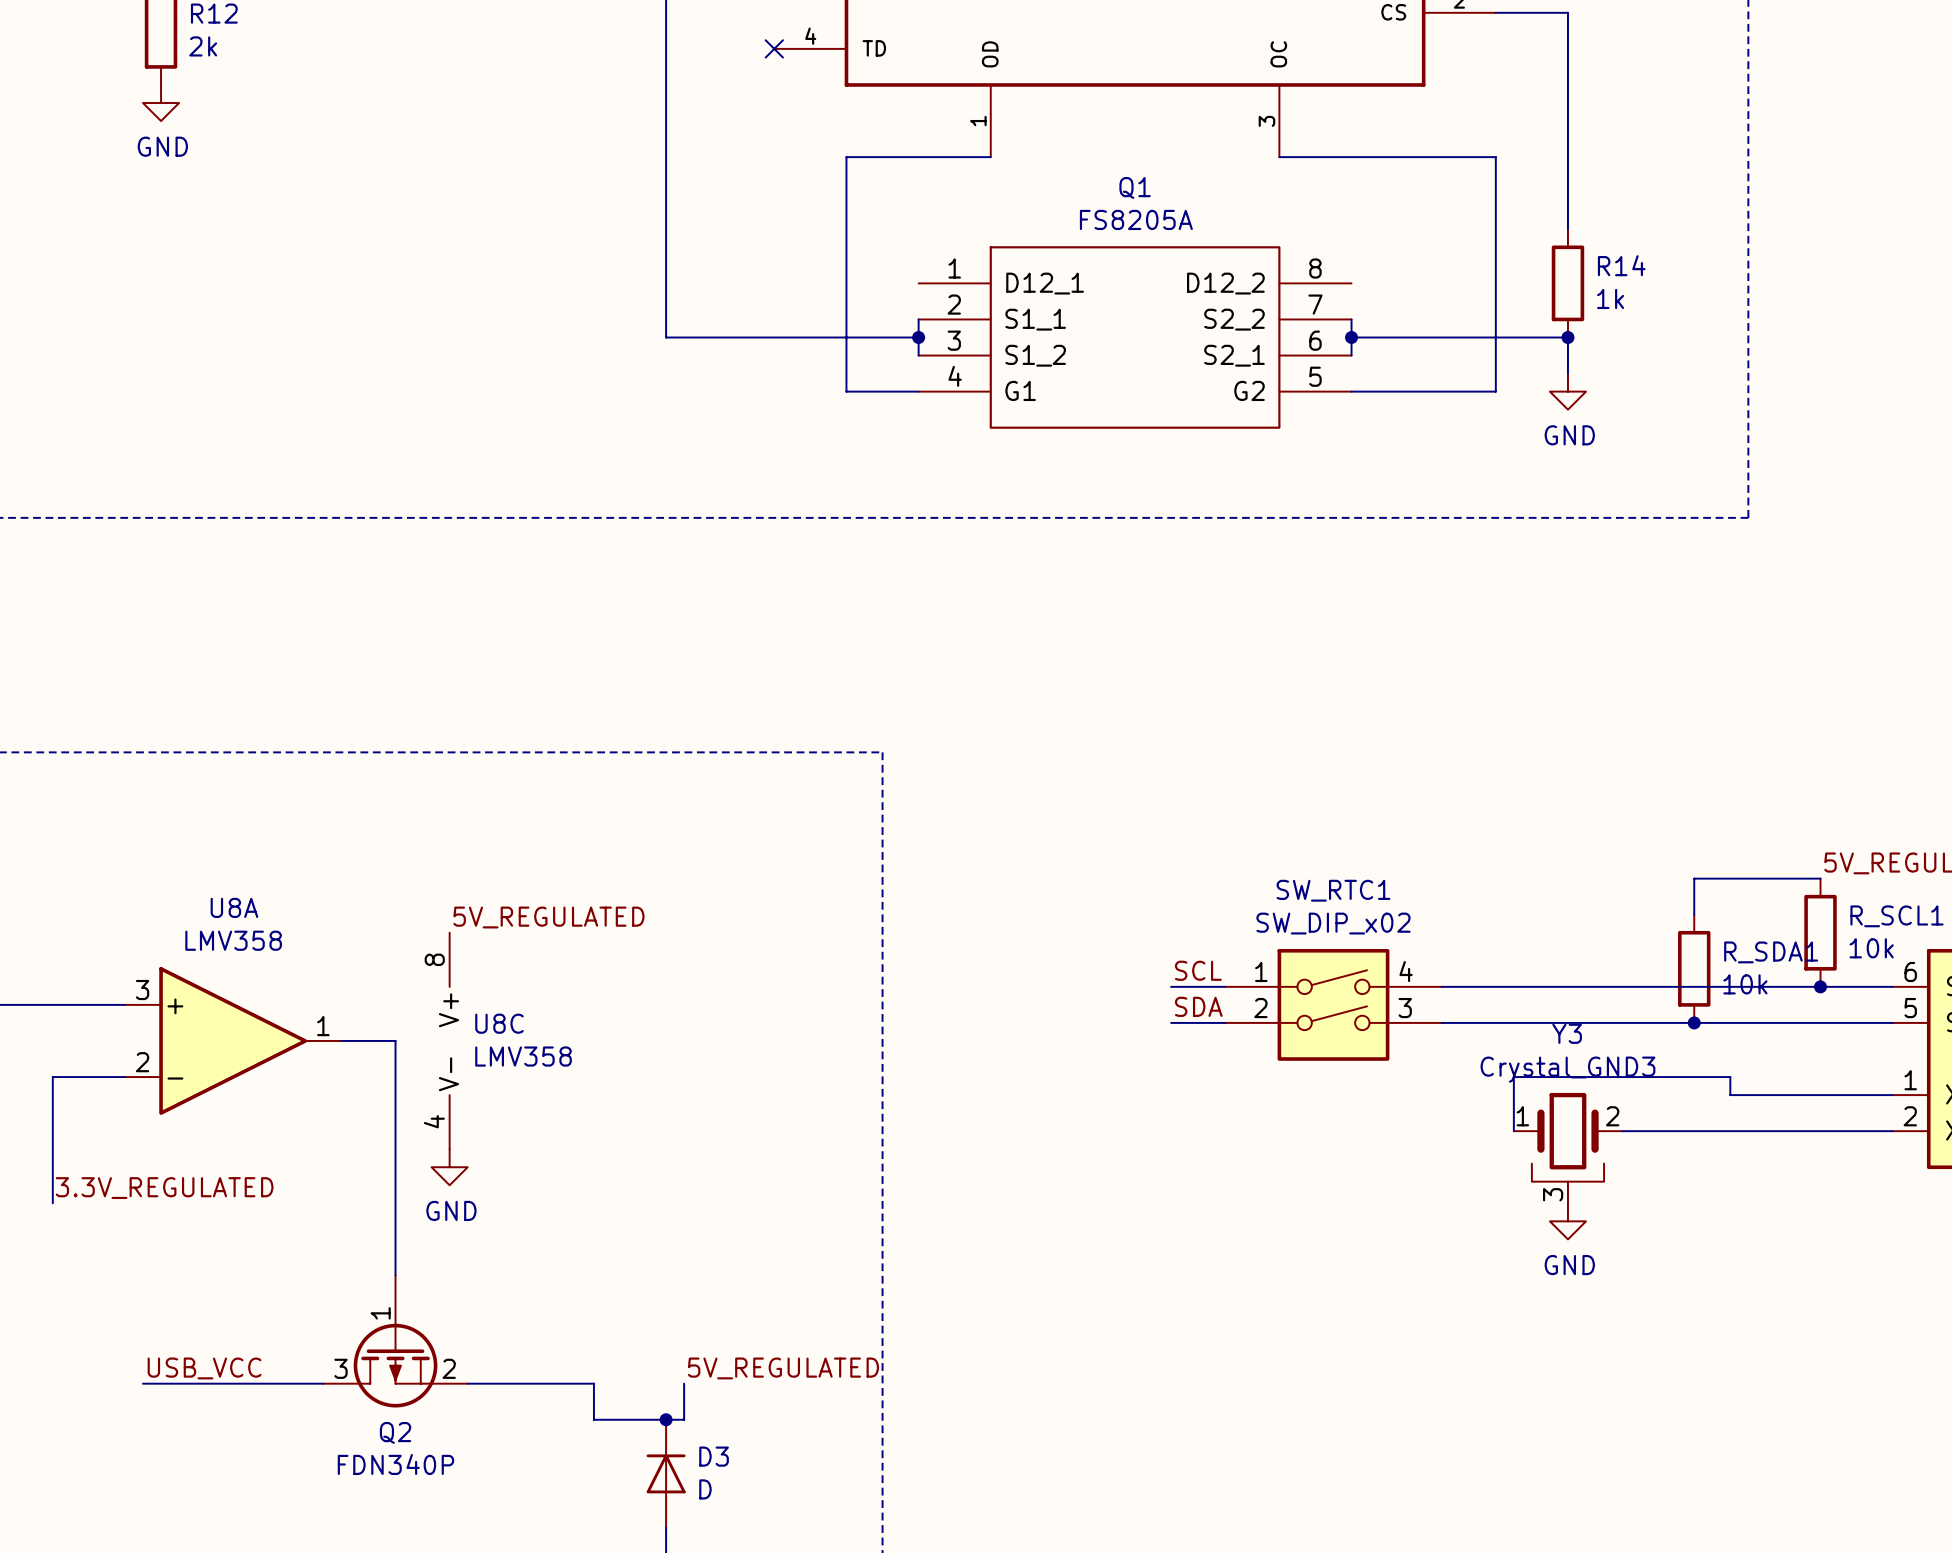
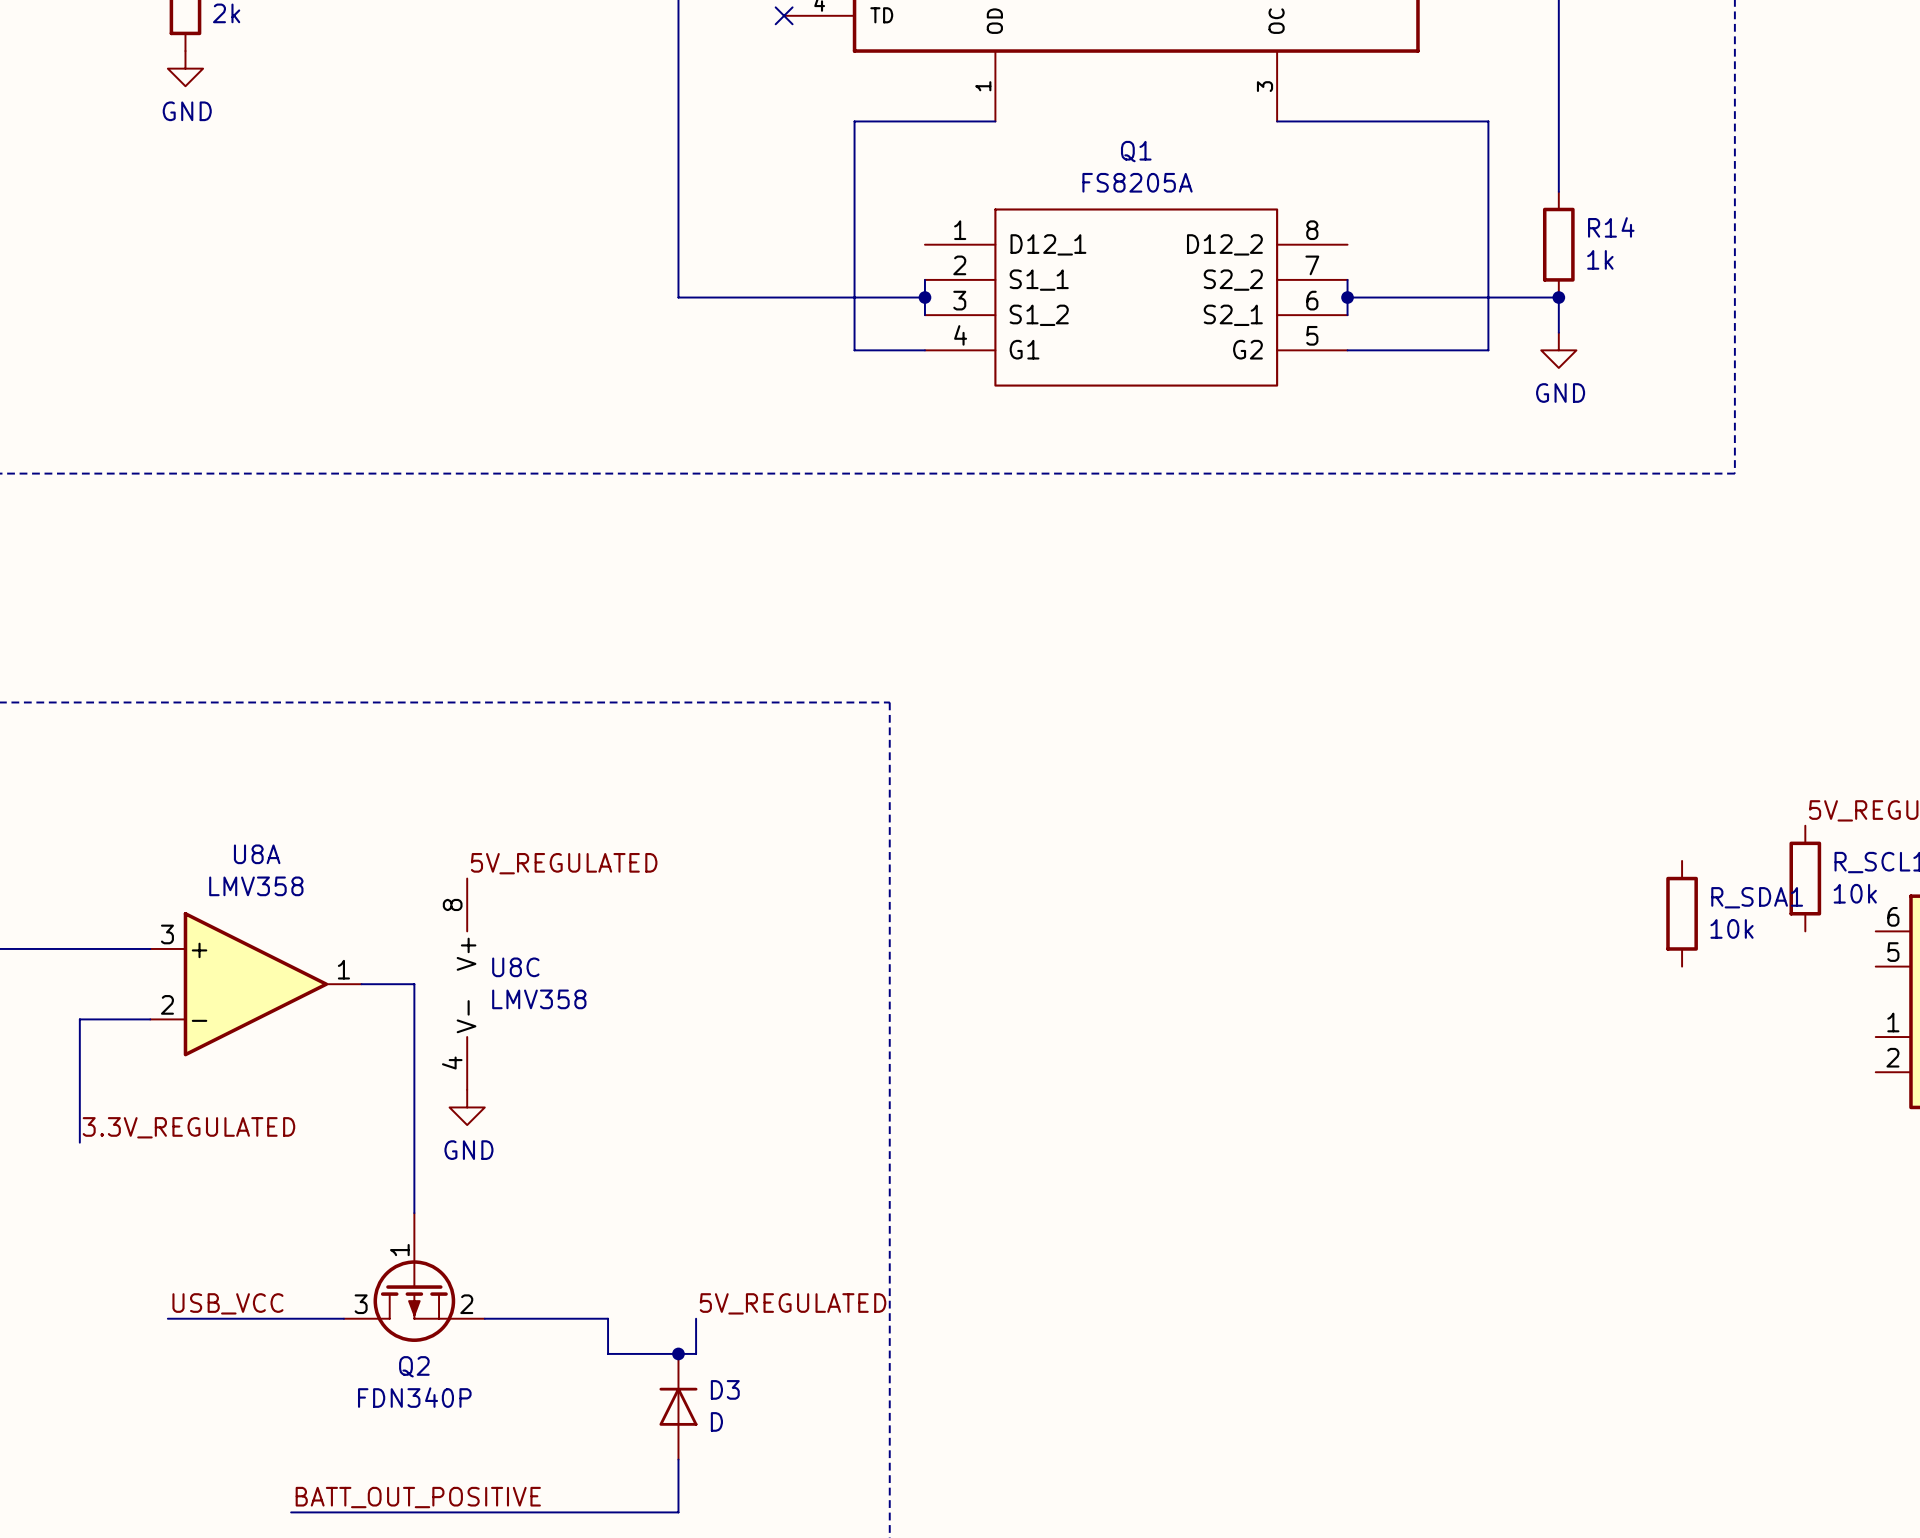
wire: (1820, 878) (1694, 878) (1694, 914) -> none
label: SCL (1198, 970) -> none
wire: (1171, 986) (1225, 986) -> none
wire: (1441, 986) (1892, 986) -> none
junction: (1820, 986) -> none
SW_RTC1: SW_DIP_x02 (1333, 1004) -> none
label: SDA (1198, 1006) -> none
wire: (1171, 1022) (1225, 1022) -> none
wire: (1441, 1022) (1892, 1022) -> none
junction: (1694, 1022) -> none
wire: (1892, 1095) (1730, 1095) (1730, 1077) (1513, 1077) (1513, 1131) -> none
wire: (1622, 1131) (1892, 1131) -> none
Y3: Crystal_GND3 (1567, 1148) -> none
power symbol: GND (1567, 1221) -> none

